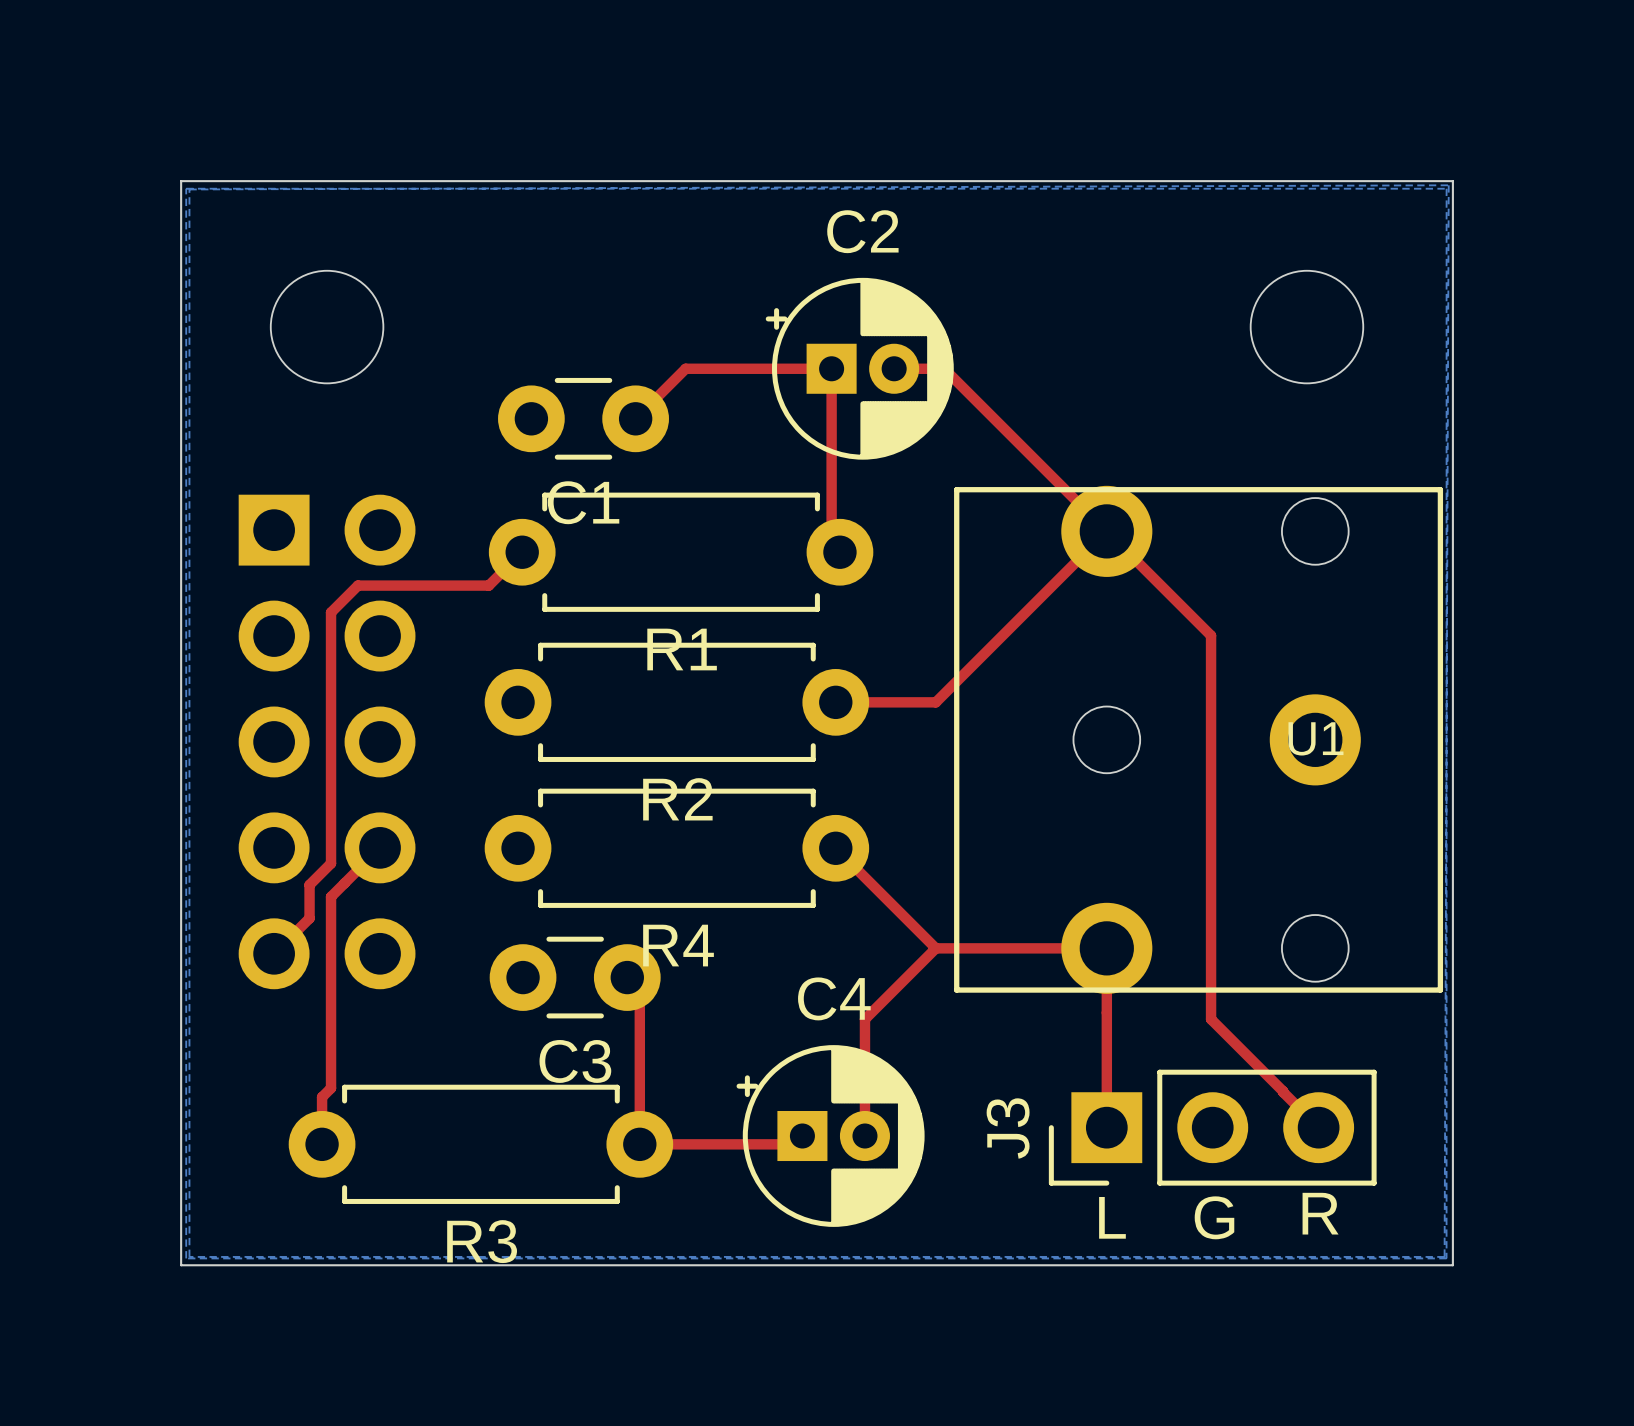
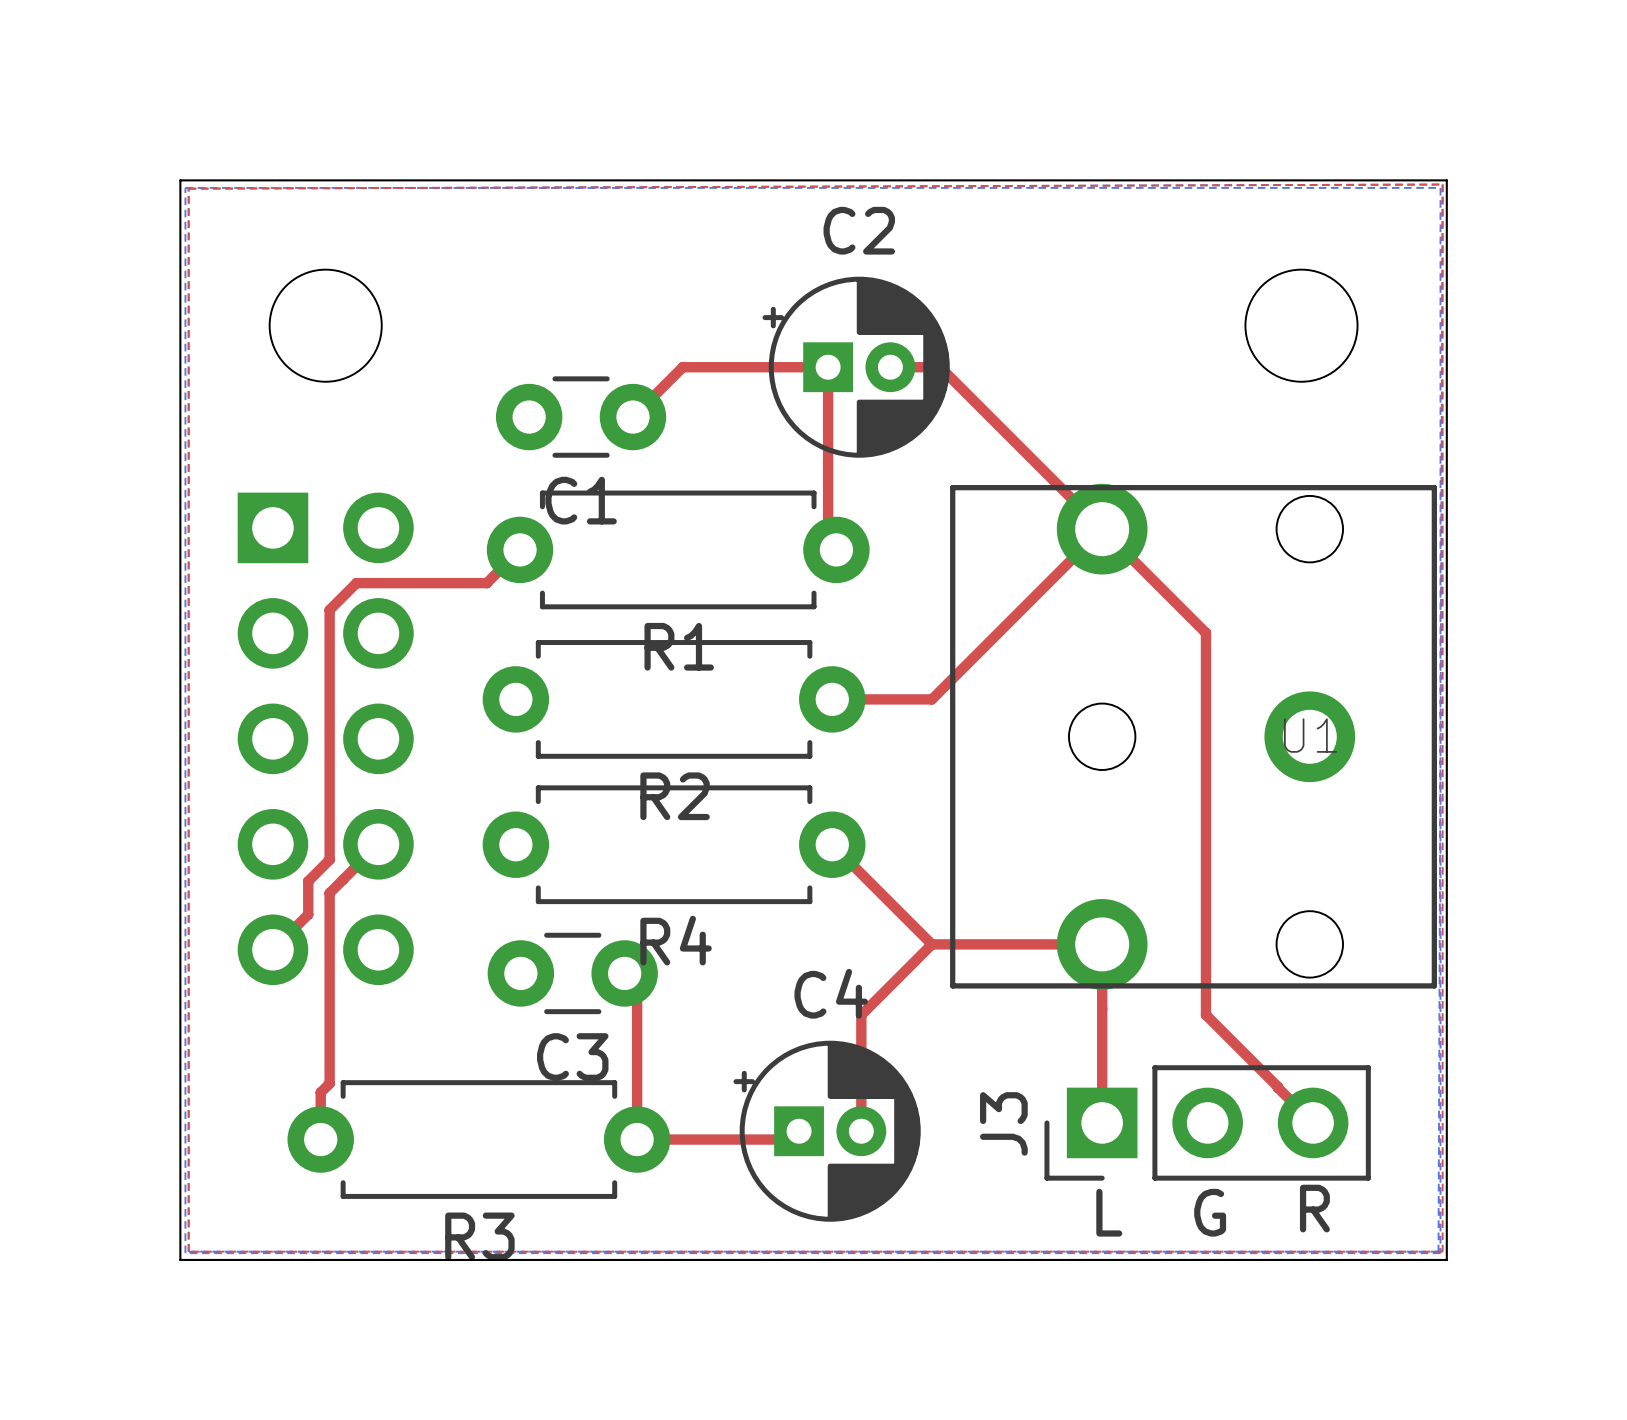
top zone outline: none -> (1442, 184) (188, 188) (188, 1251) (1442, 1251) (1442, 184)

